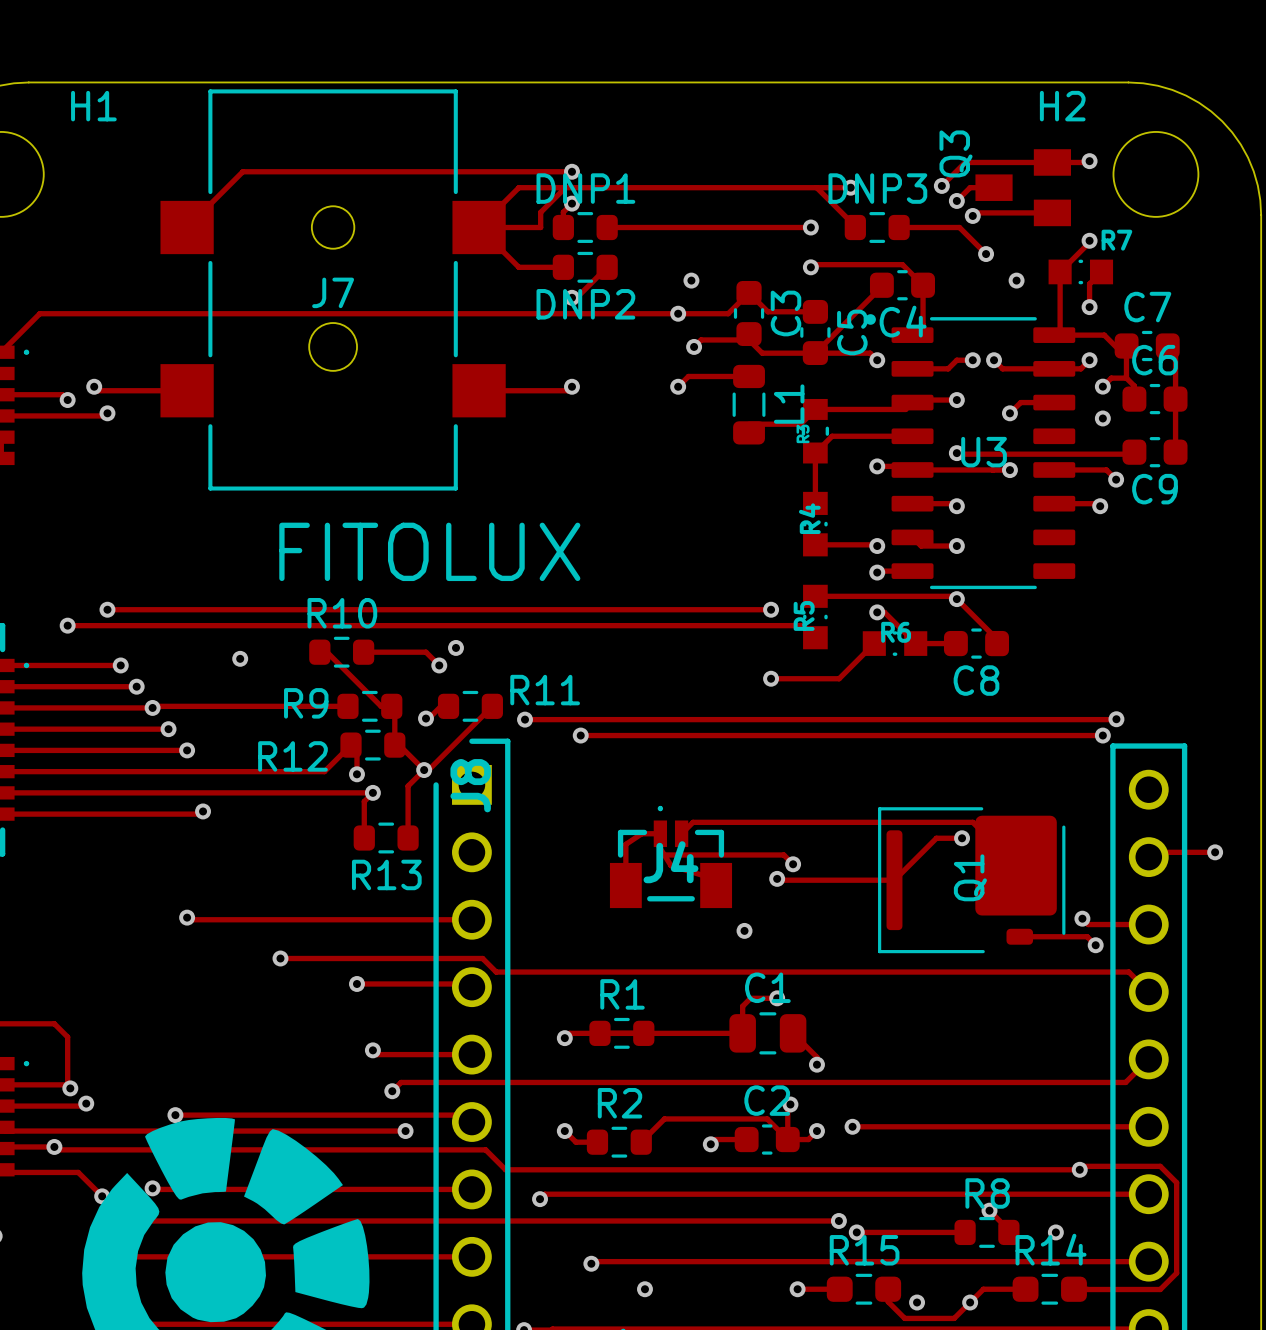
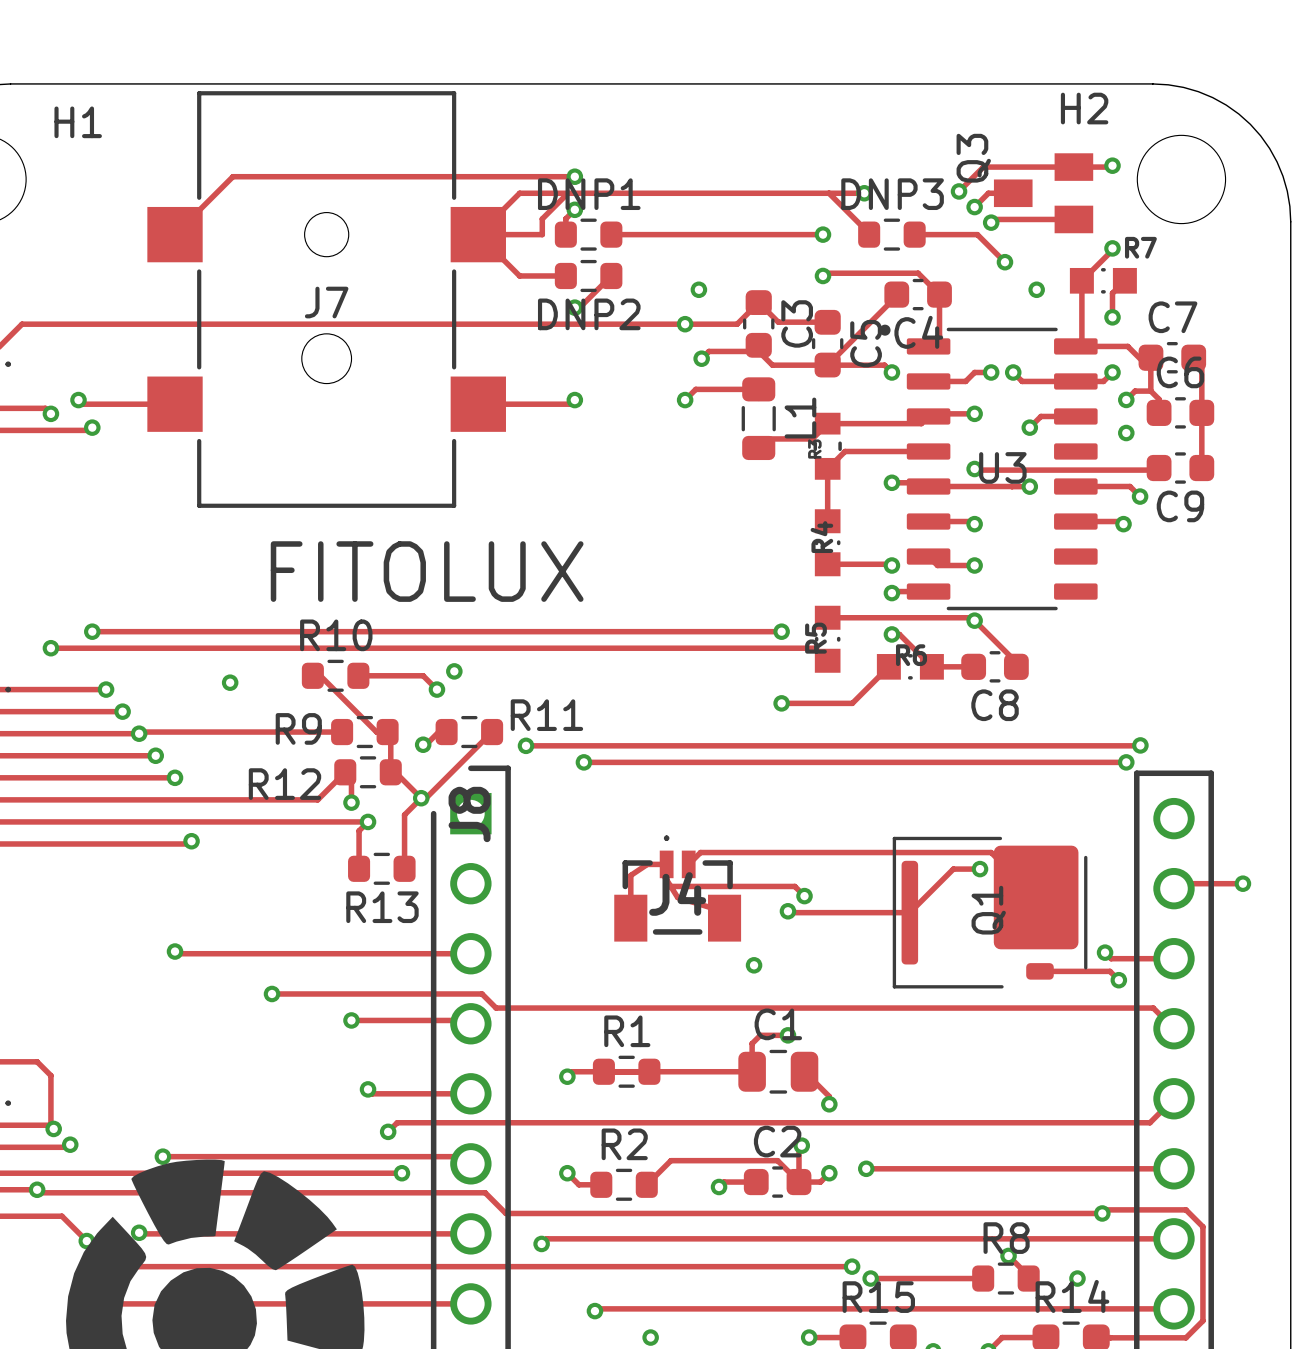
H1 name position: H1 (93, 106) -> H1 (78, 122)

